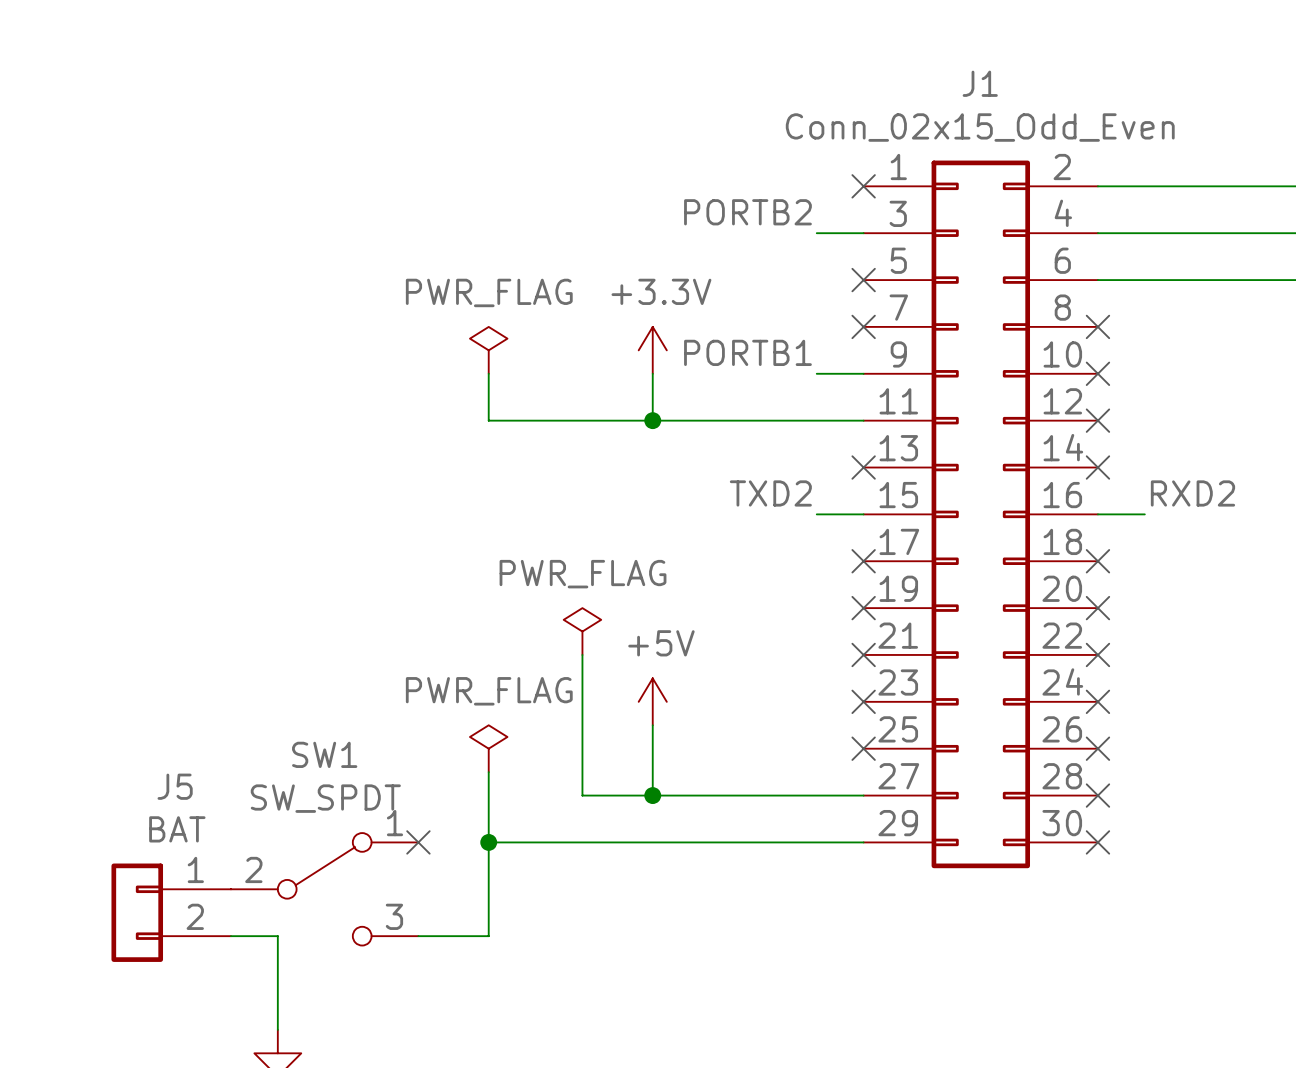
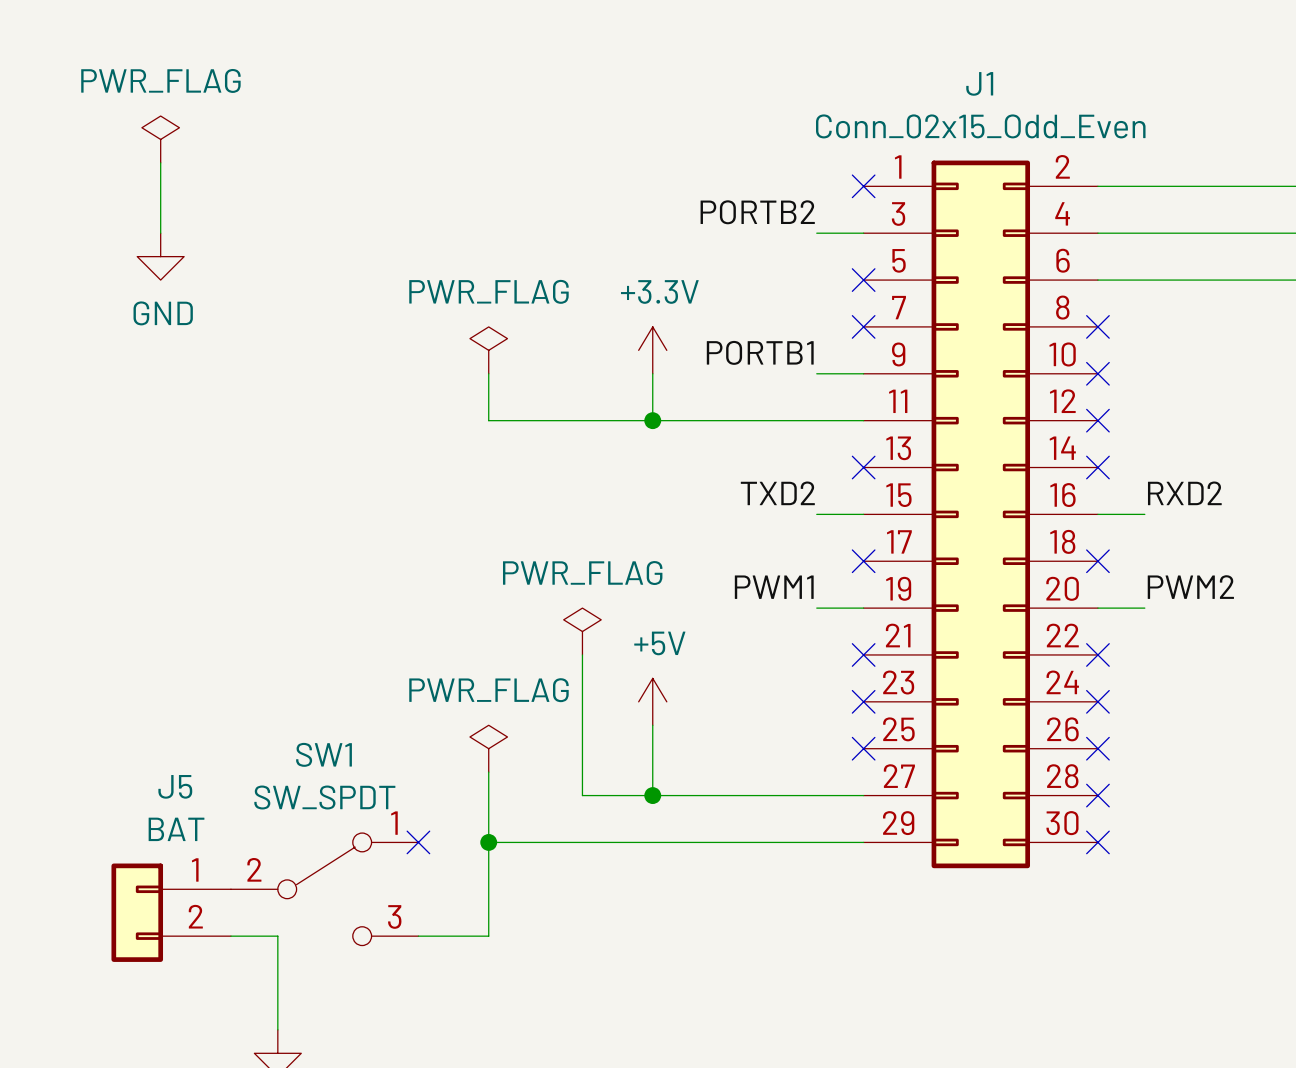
power symbol: none -> PWR_FLAG (160, 139)
wire: none -> (160, 162) (160, 233)
power symbol: none -> GND (160, 256)
label: none -> PWM1 (774, 587)
label: none -> PWM2 (1190, 587)
wire: none -> (816, 608) (863, 608)
no-connect mark: (863, 608) -> none
wire: none -> (1097, 608) (1144, 608)
no-connect mark: (1097, 608) -> none

